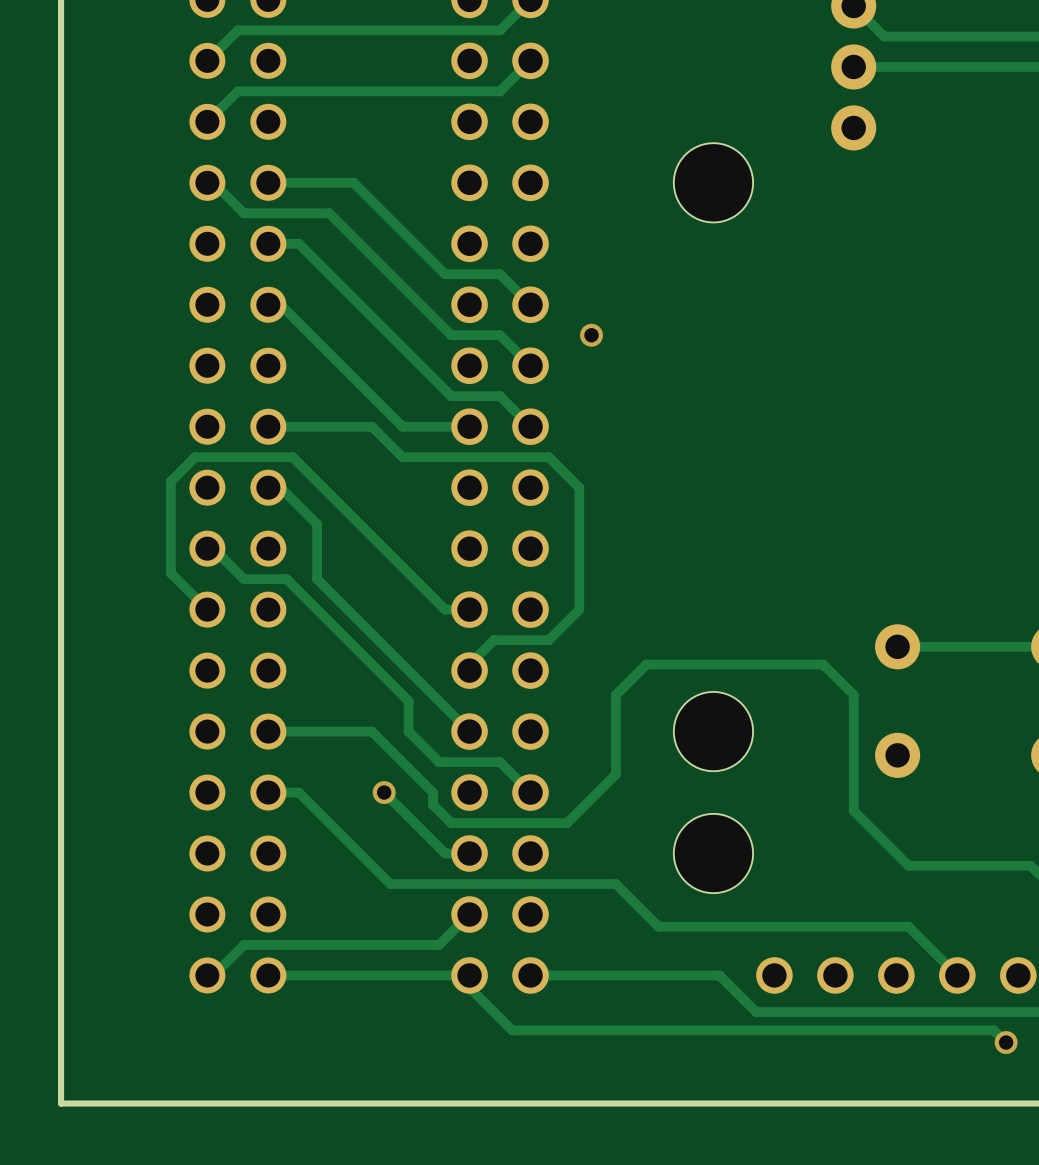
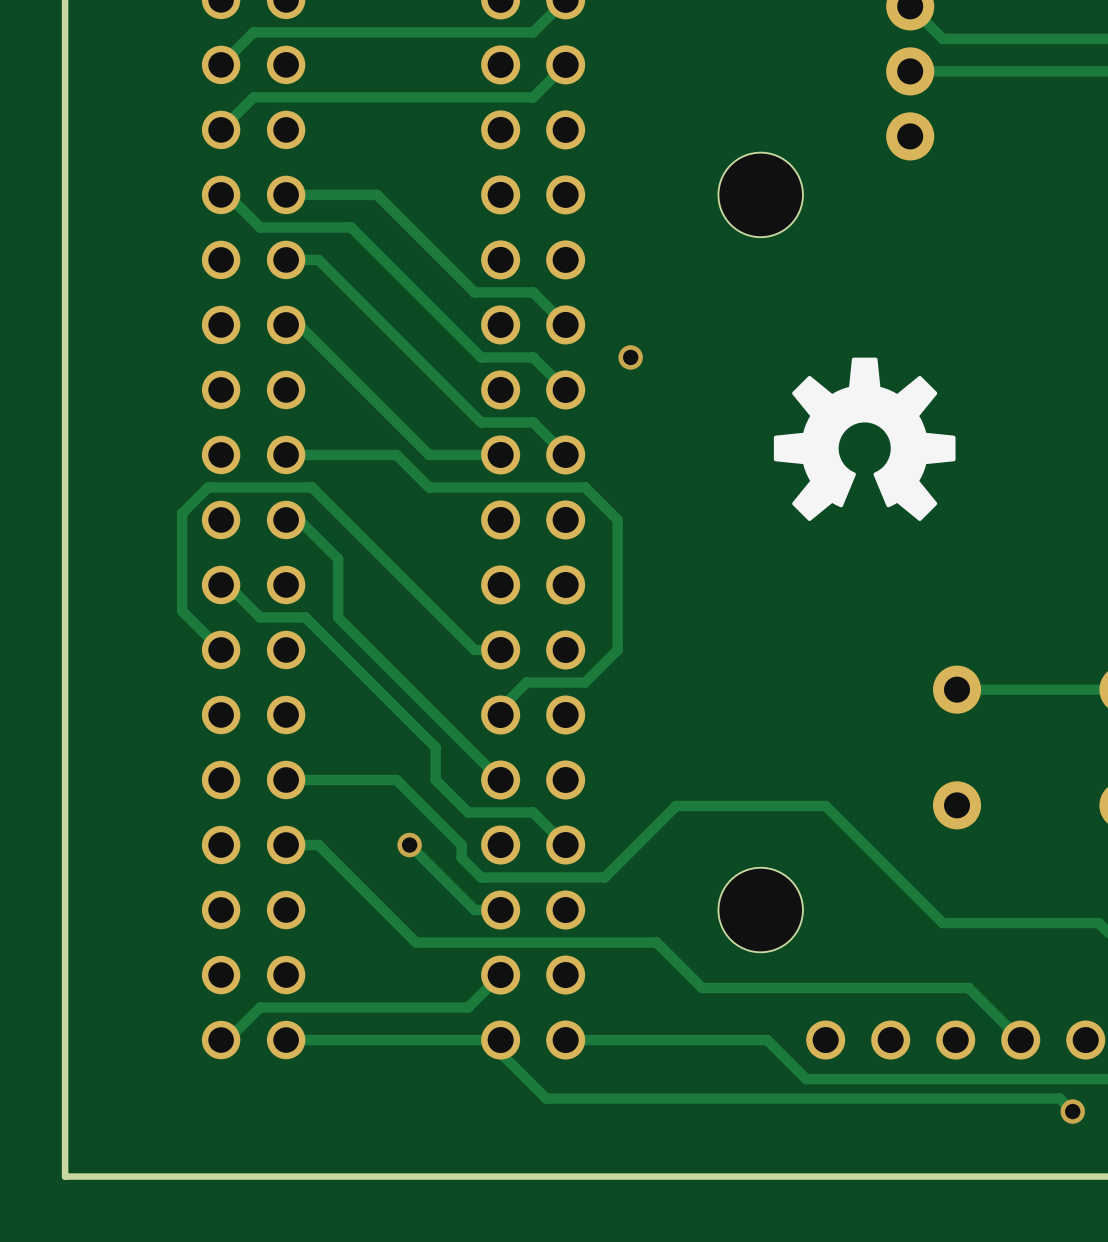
drawing: none -> [773, 357, 956, 521]
part: (713, 731) -> none
track: (615, 774) (615, 694) (646, 664) (823, 664) (853, 694) (853, 810) (908, 865) -> (656, 825) (676, 806) (825, 806) (942, 923) (968, 923)

